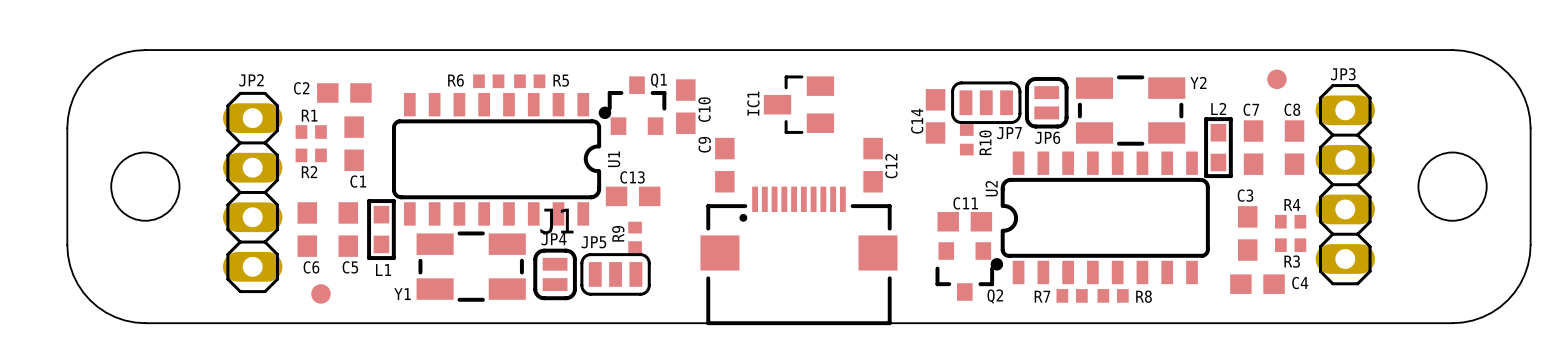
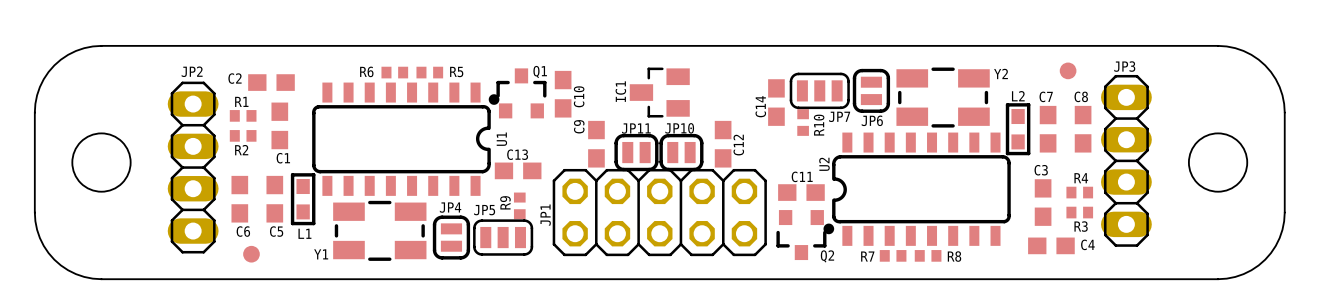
JP11: none -> (636, 152)
JP10: none -> (681, 152)
JP1: none -> (659, 212)
J1: (798, 255) -> none

